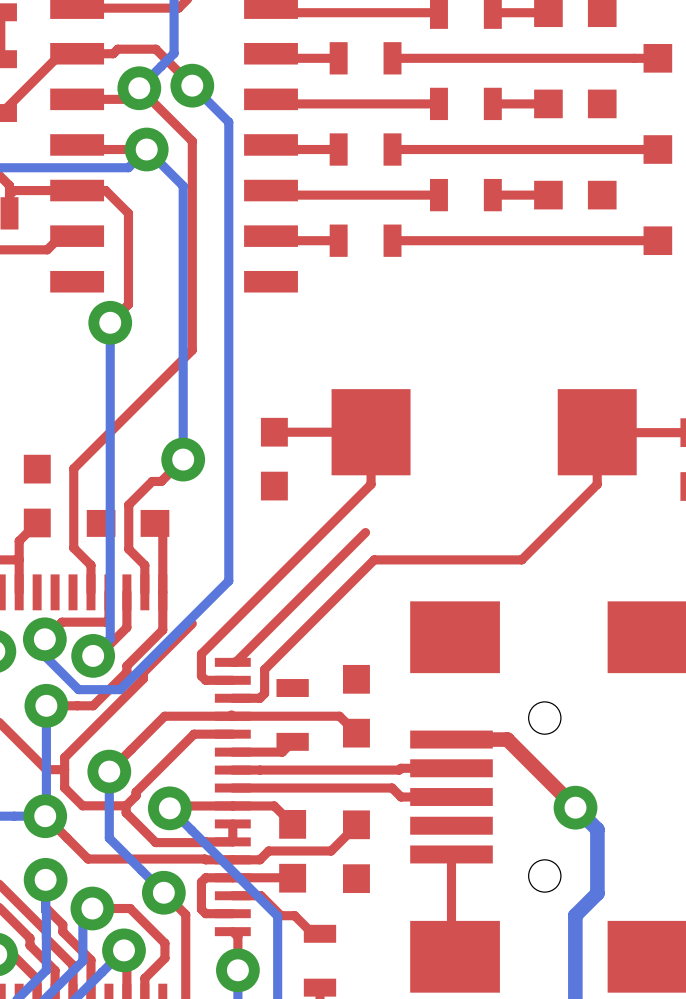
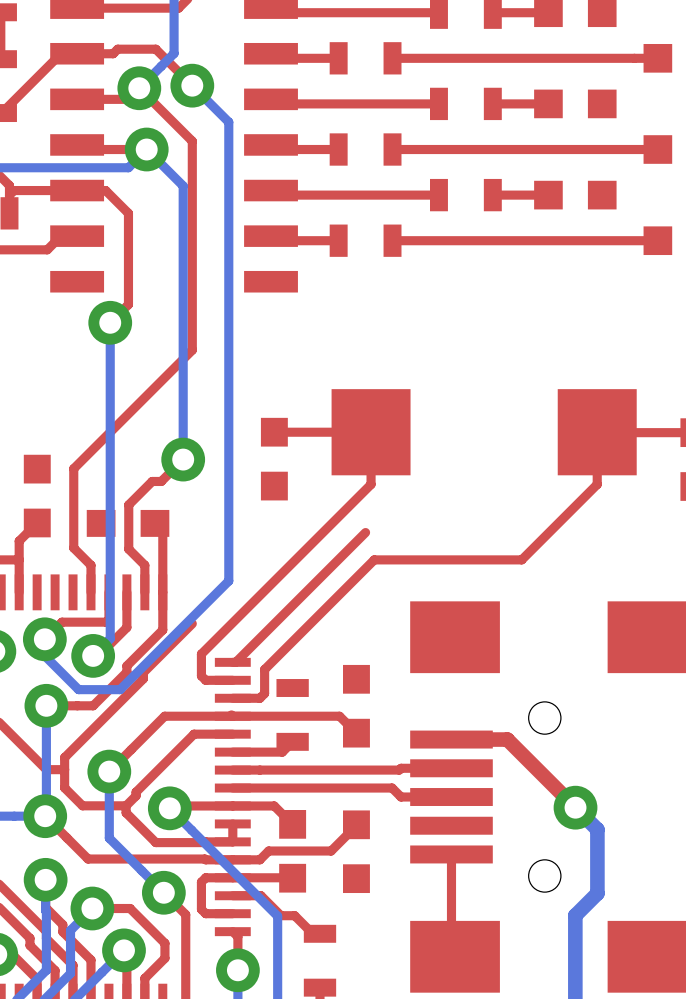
bottom track: (82, 918) (82, 961) (70, 973) -> (82, 918) (70, 930) (70, 973)

